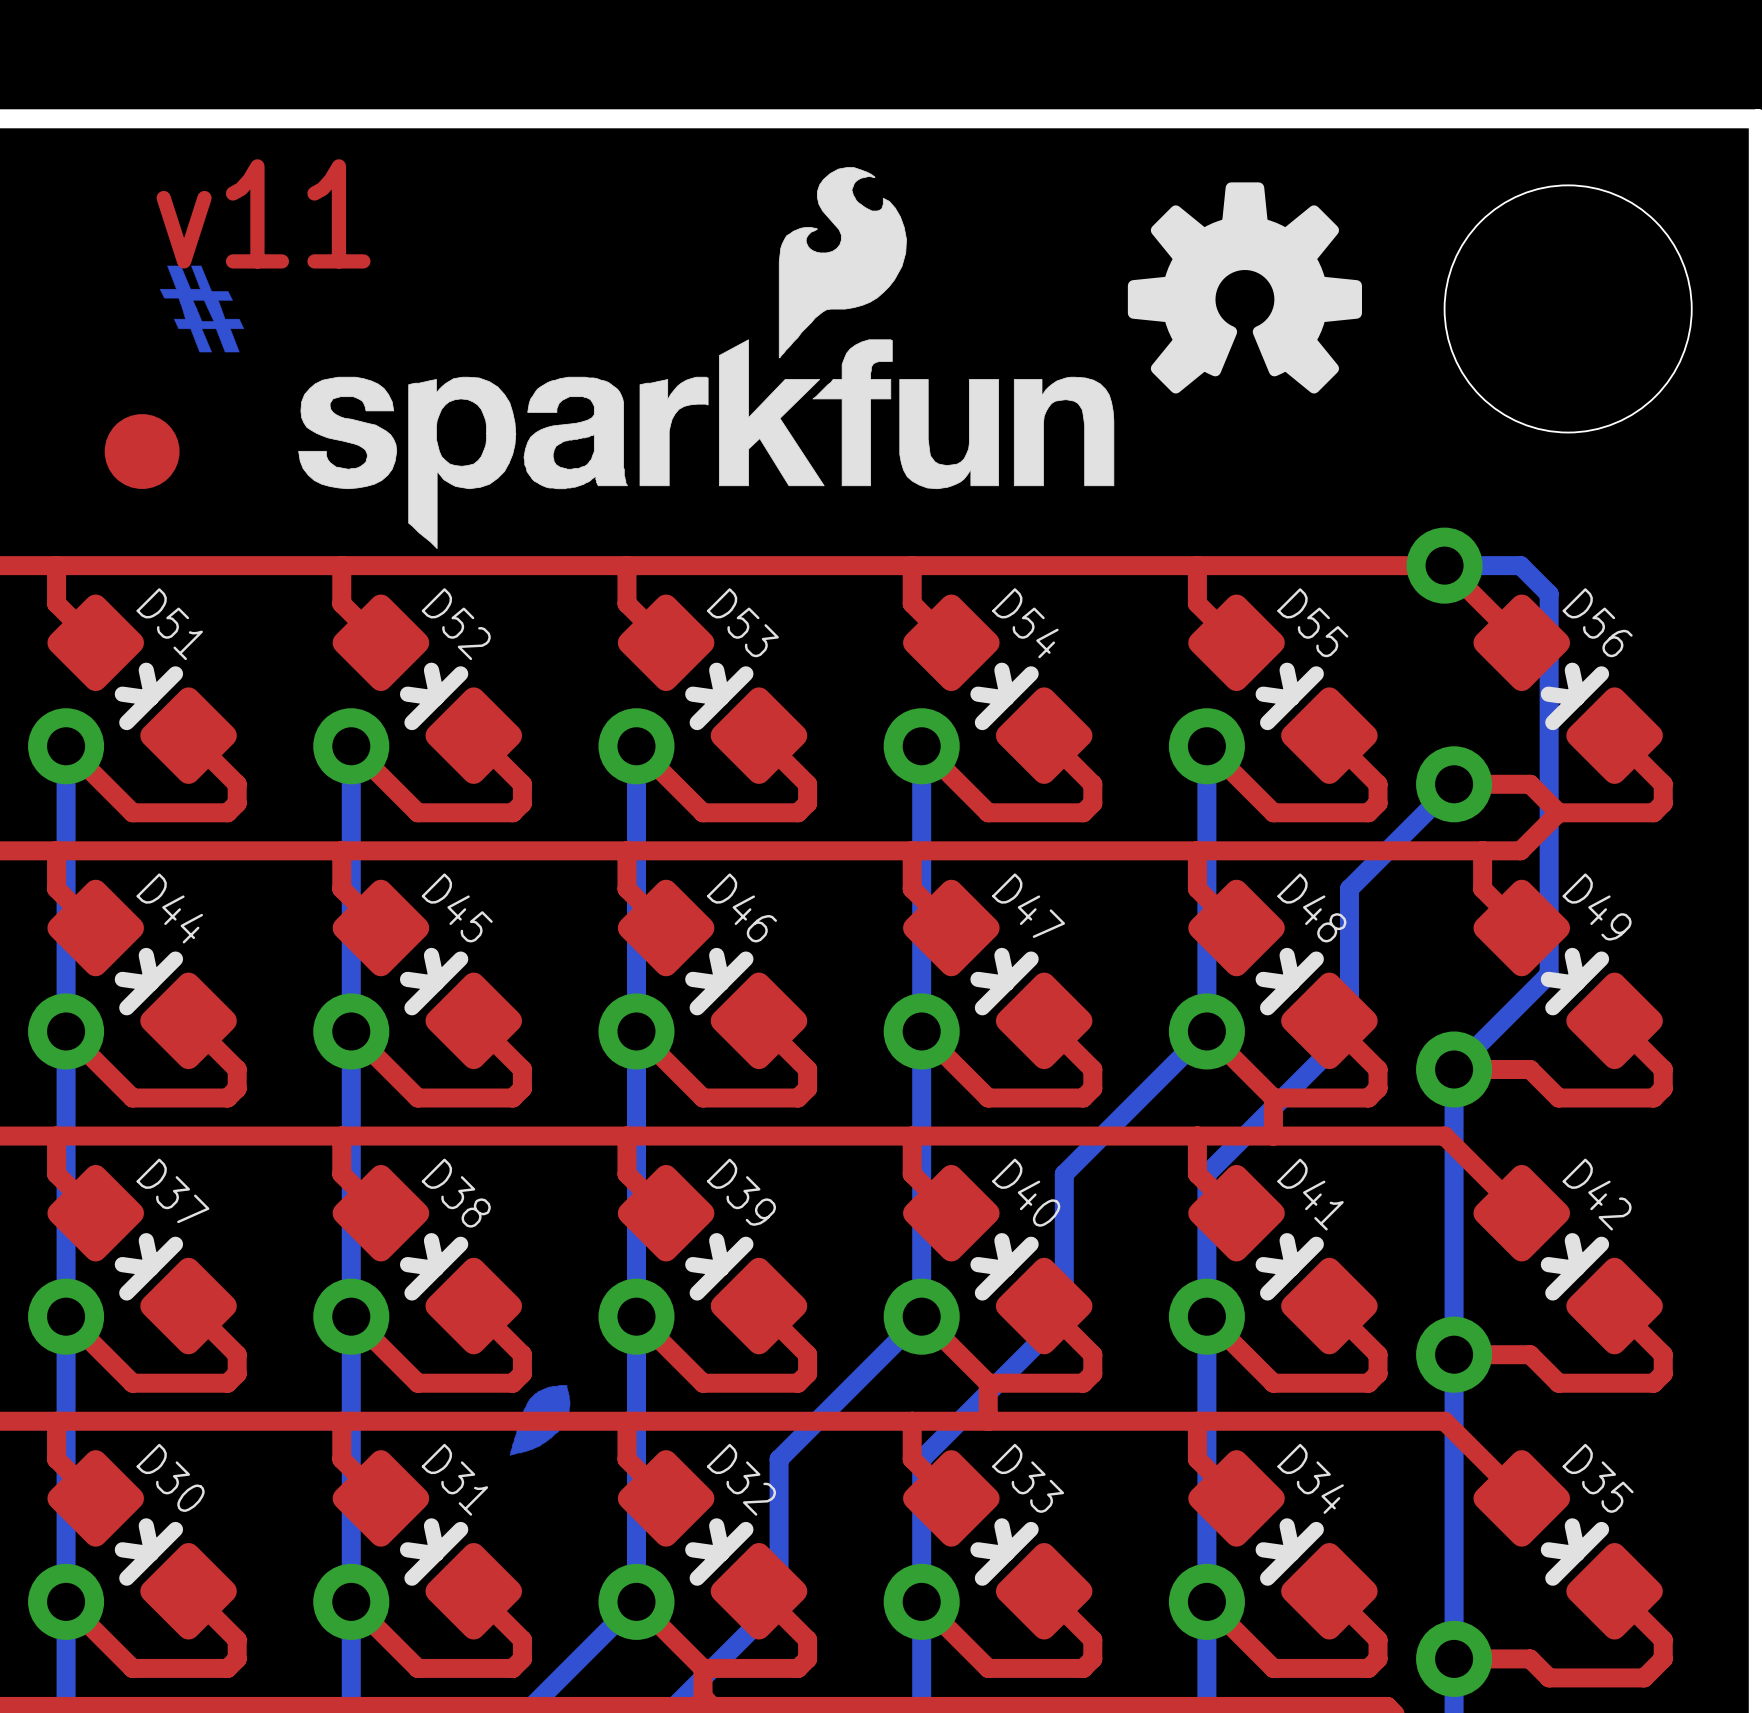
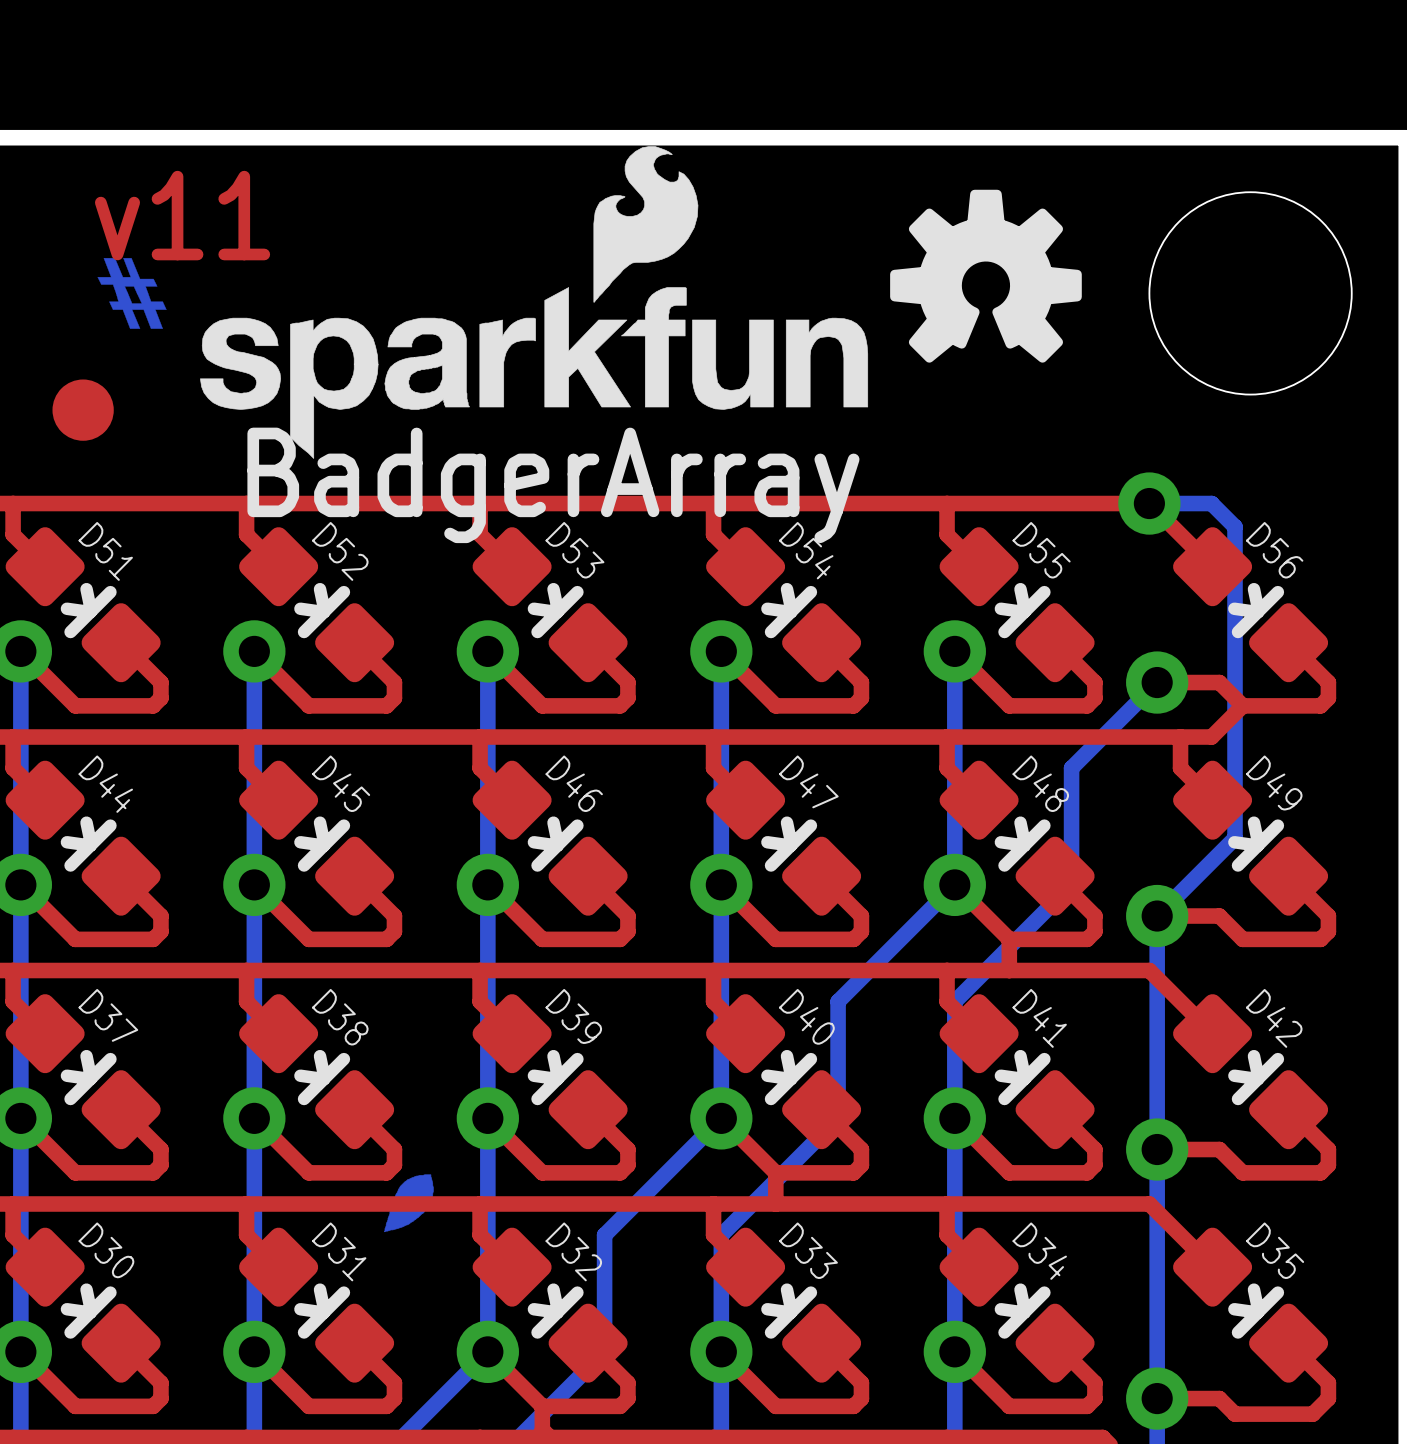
drawing position: (706, 358) -> (534, 302)
text: none -> BadgerArray (553, 485)

